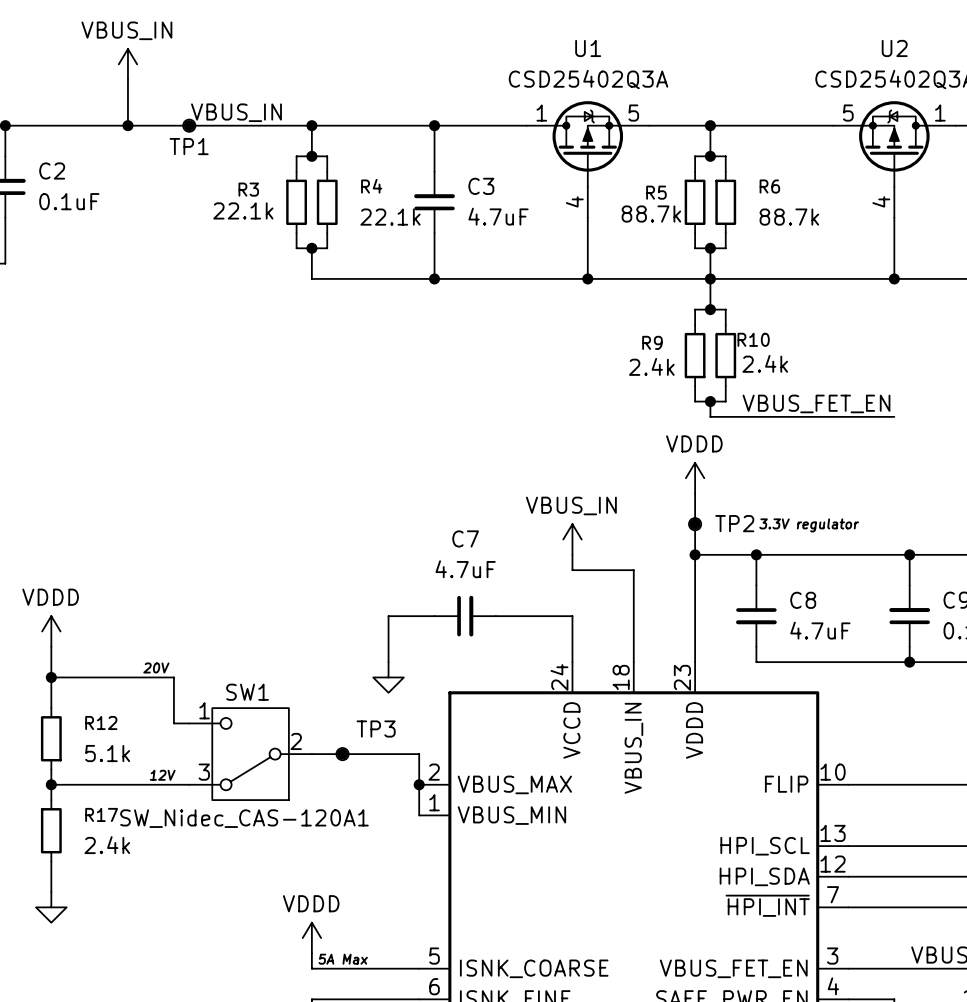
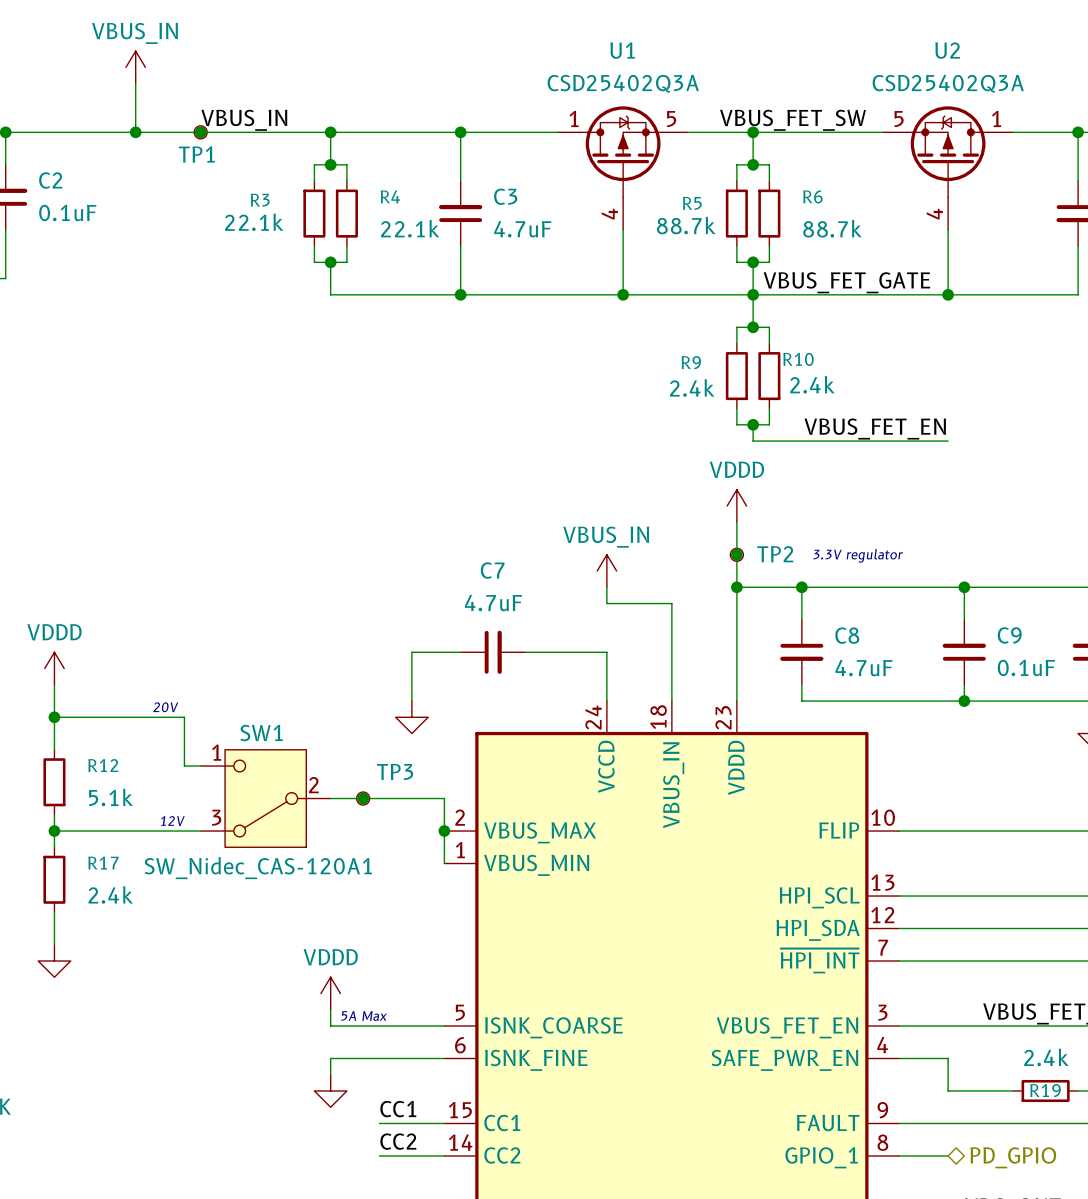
label: none -> VBUS_FET_SW (793, 120)
label: none -> VBUS_FET_GATE (846, 282)

